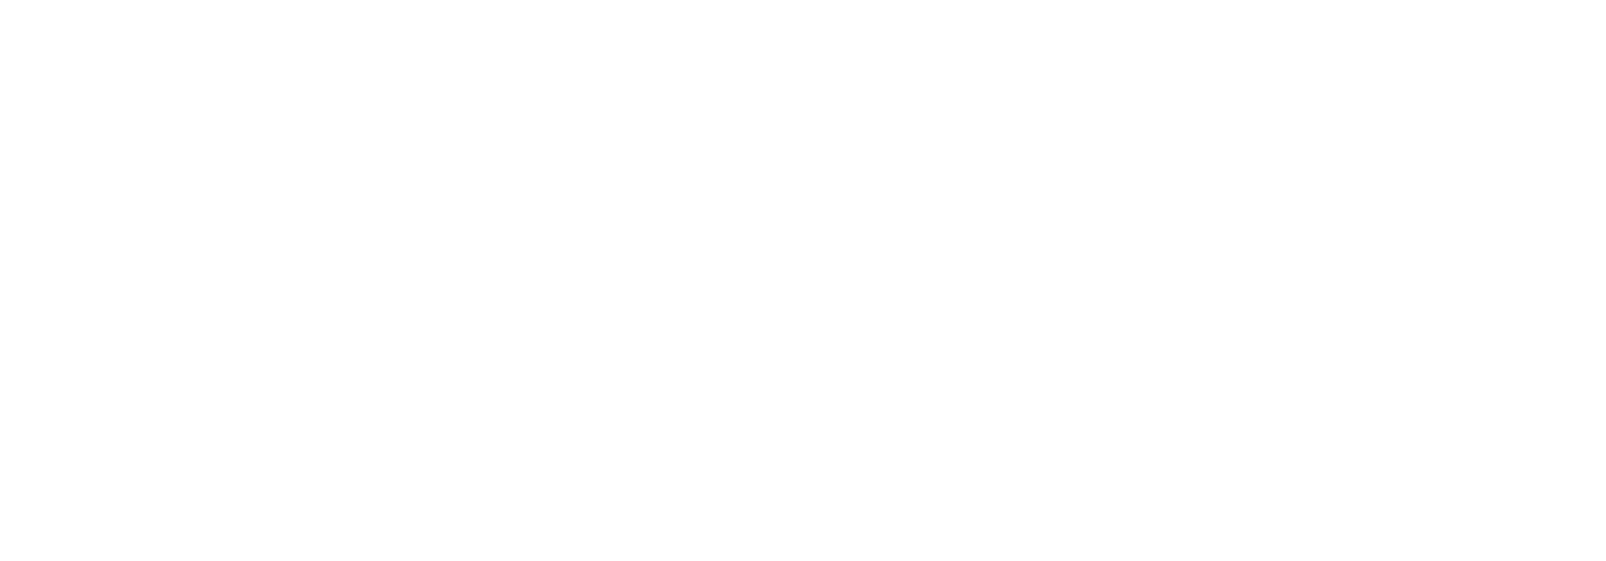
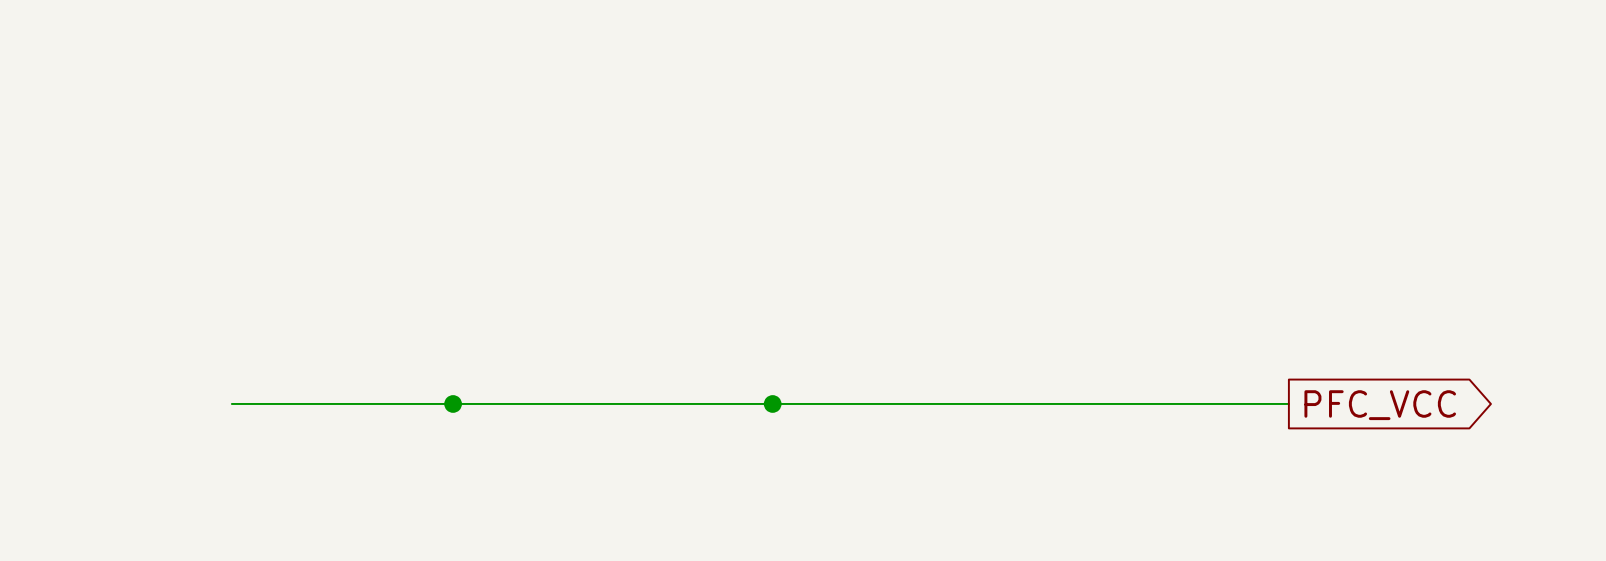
wire: none -> (231, 403) (1288, 403)
junction: none -> (453, 403)
junction: none -> (772, 403)
global label: none -> PFC_VCC (1380, 405)

